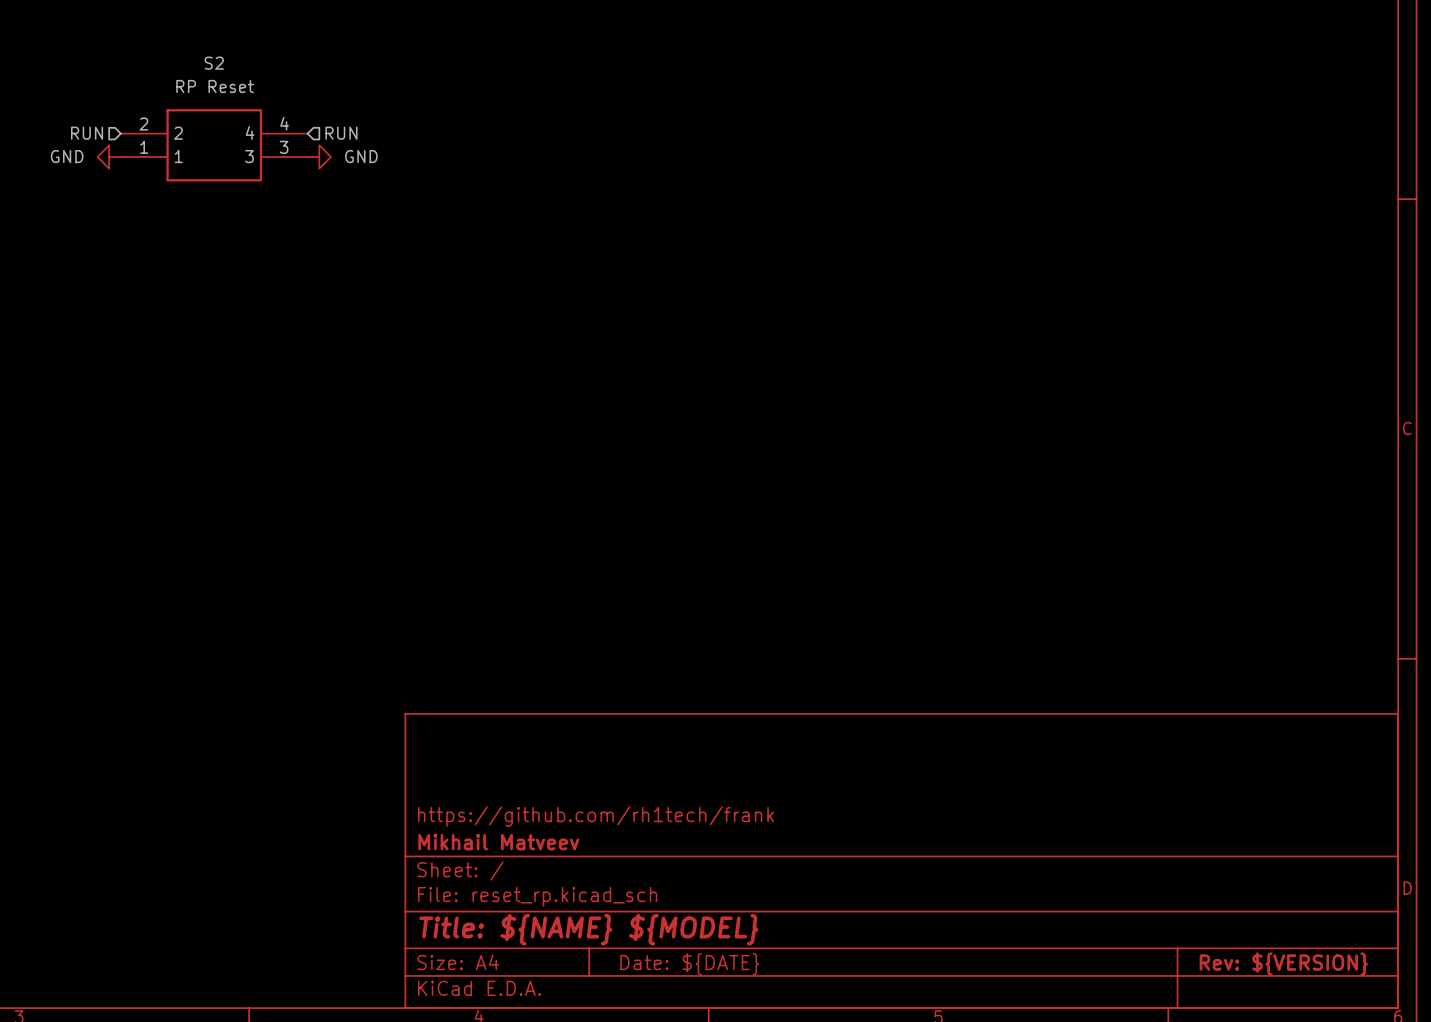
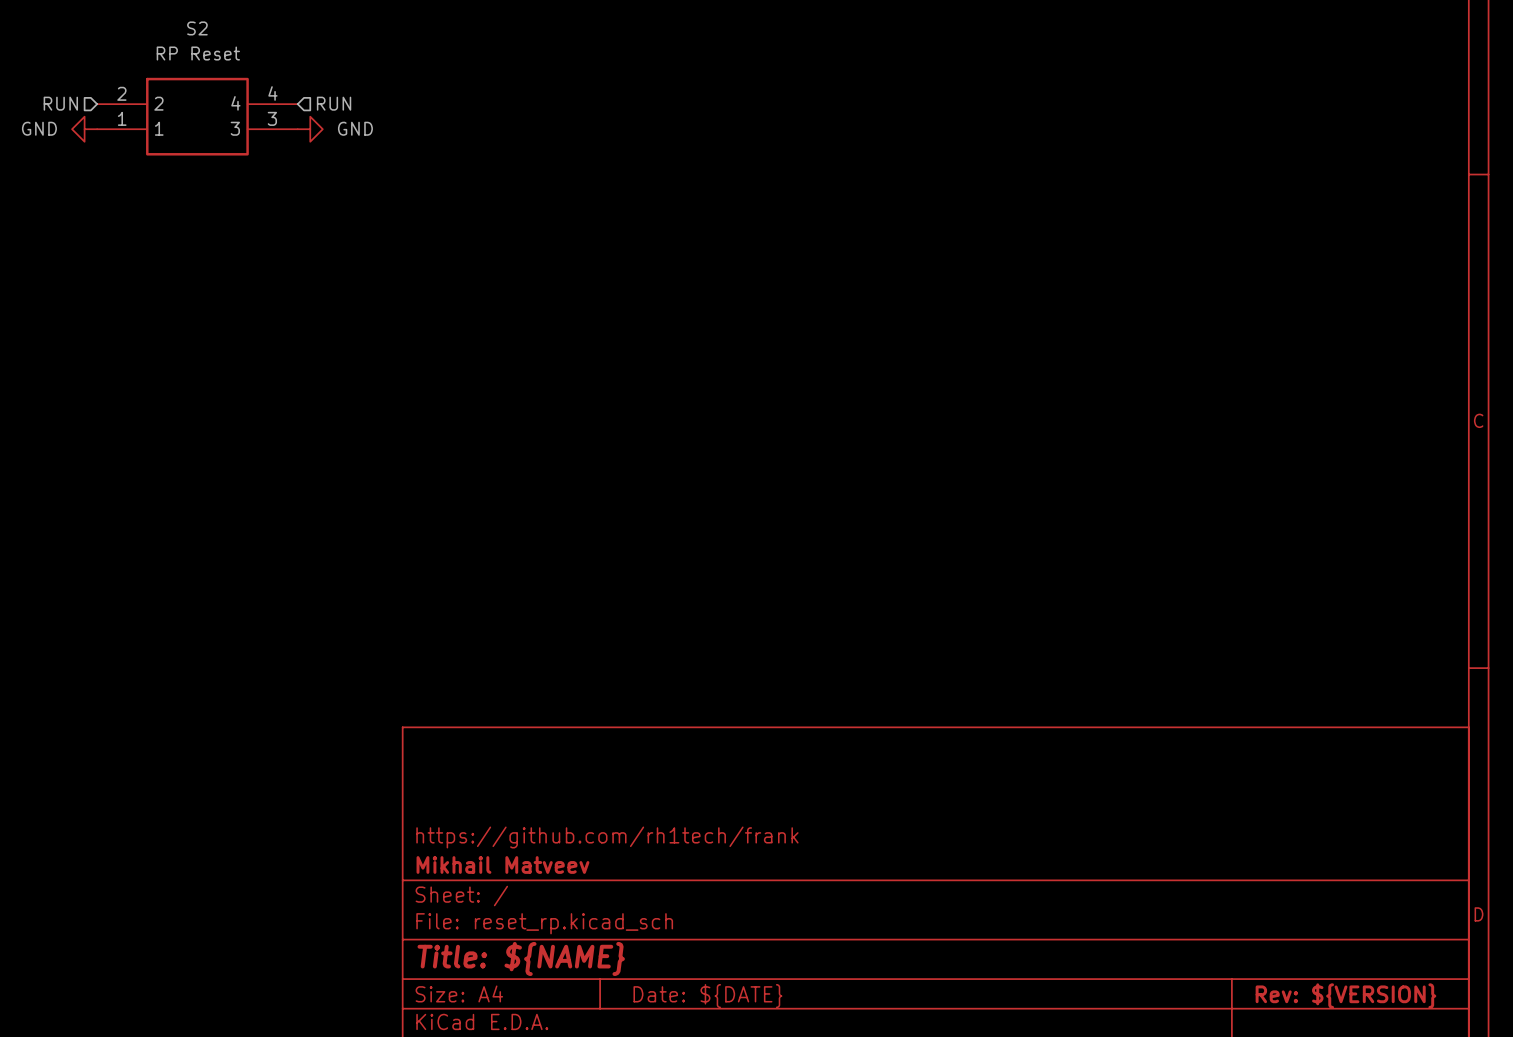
title block: Title: ${NAME} ${MODEL} (588, 929) -> Title: ${NAME} (521, 958)

